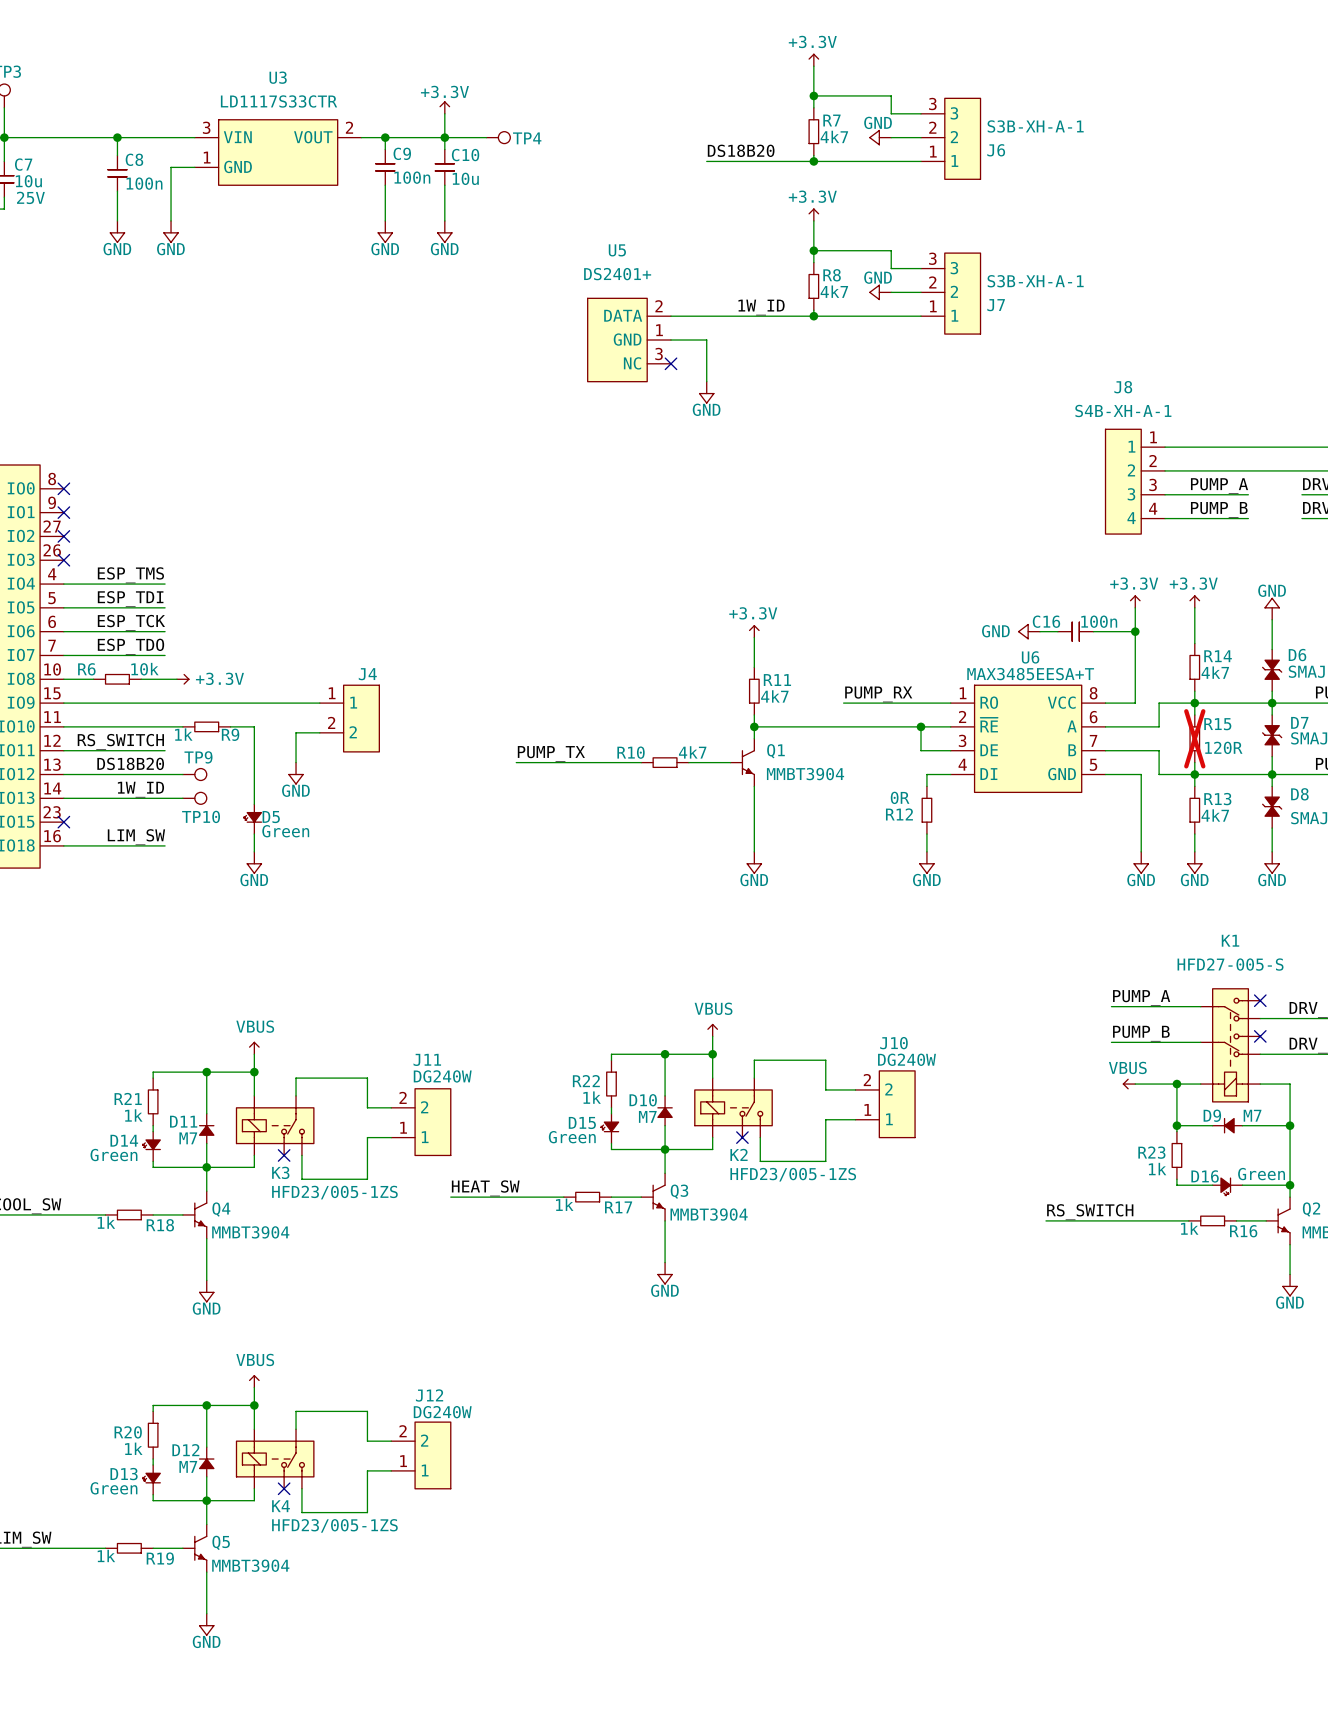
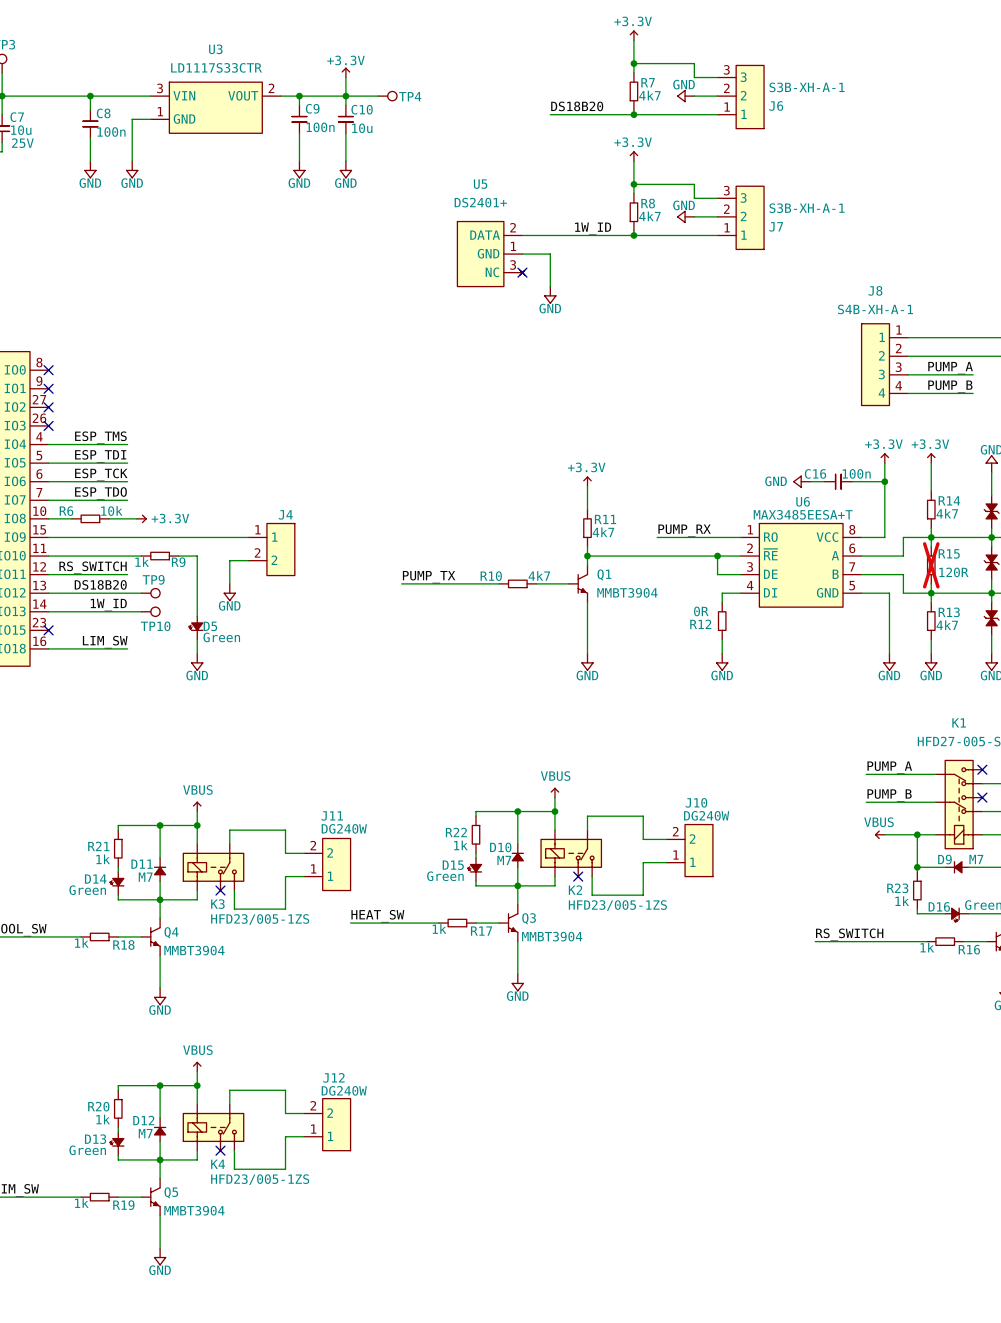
U5 symbol: [587, 298, 672, 382] -> [457, 221, 525, 287]

